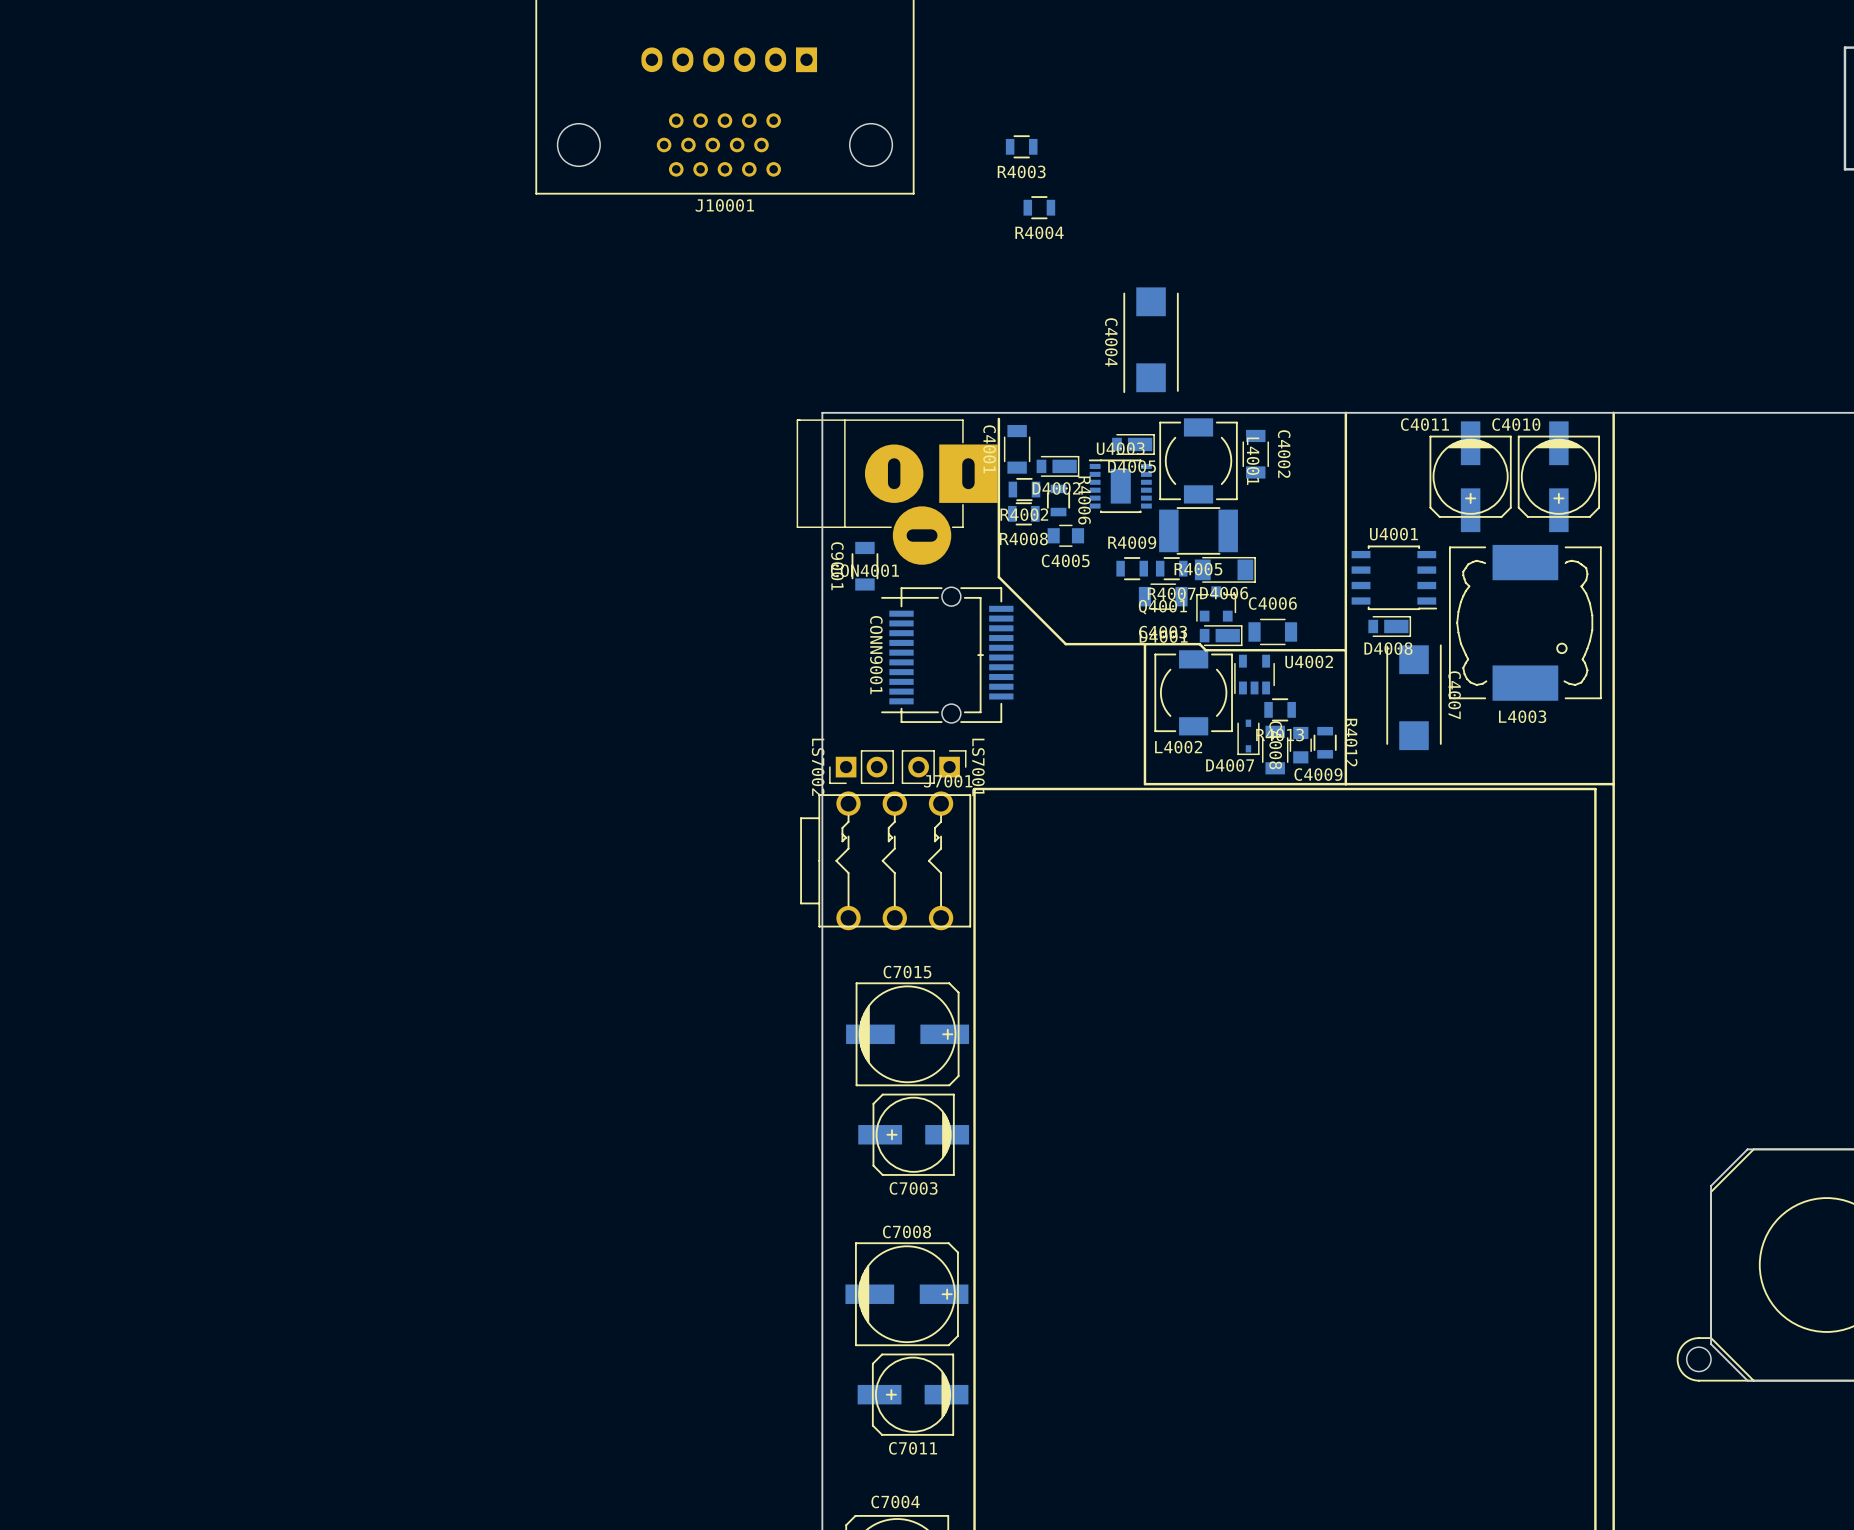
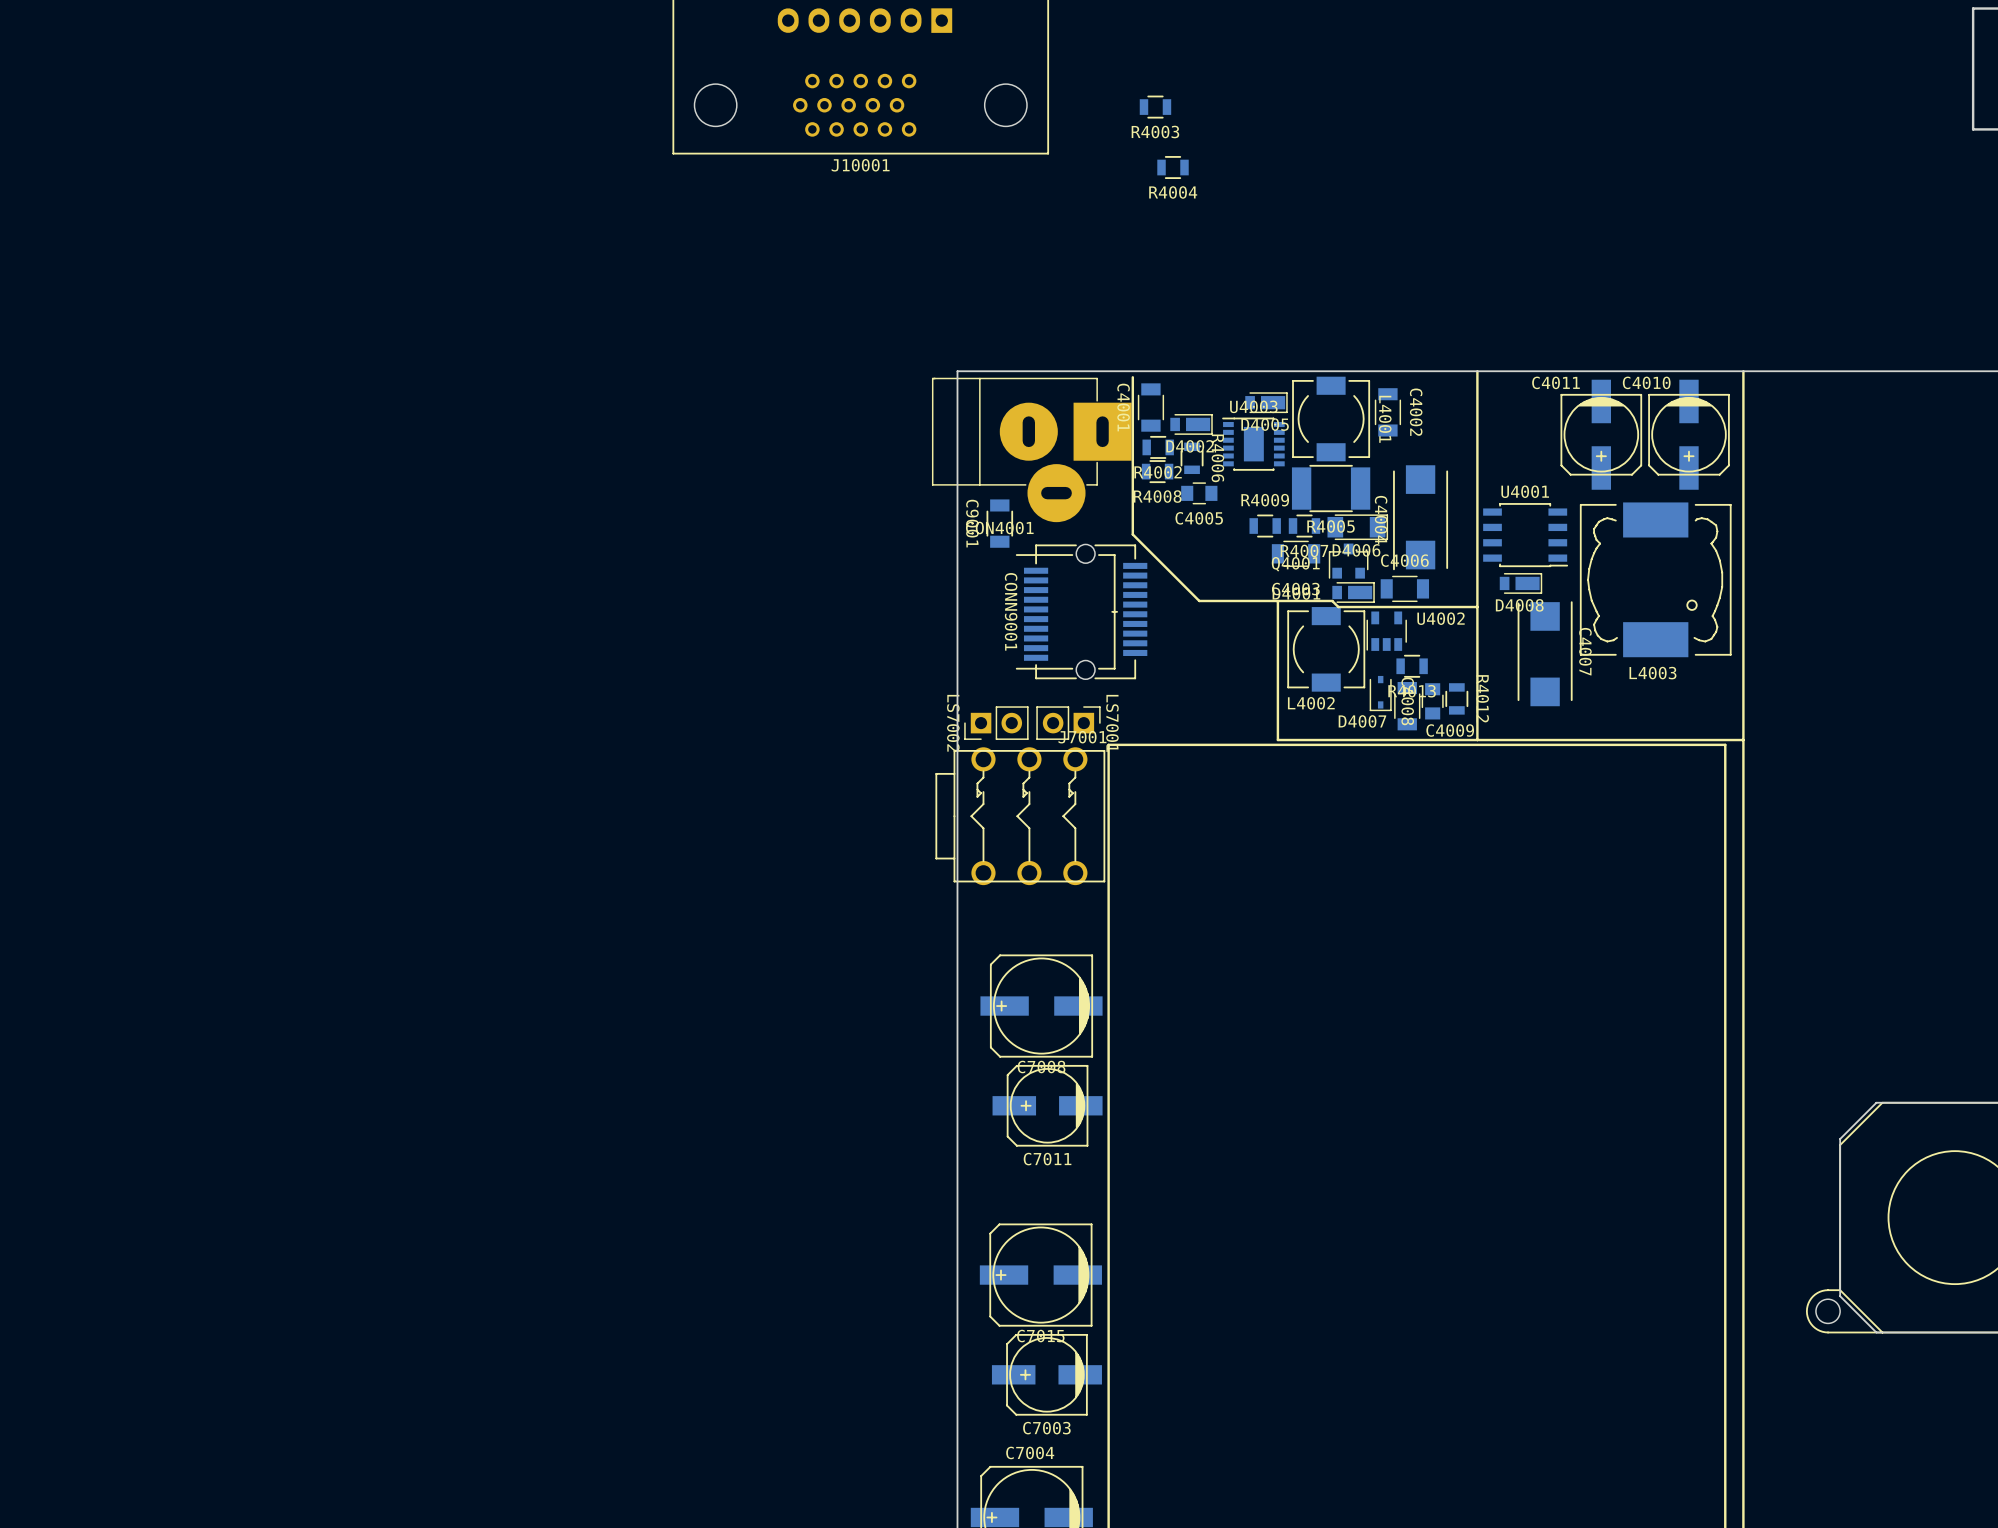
C4004 position: (1151, 340) -> (1420, 517)
C7015 rotation: 0° (907, 1034) -> 180° (1040, 1275)
C7015 position: (907, 1034) -> (1040, 1275)
C7003 position: (913, 1134) -> (1046, 1374)
C7008 rotation: 0° (906, 1294) -> 180° (1041, 1006)
C7008 position: (906, 1294) -> (1041, 1006)
C7011 position: (913, 1394) -> (1047, 1105)

